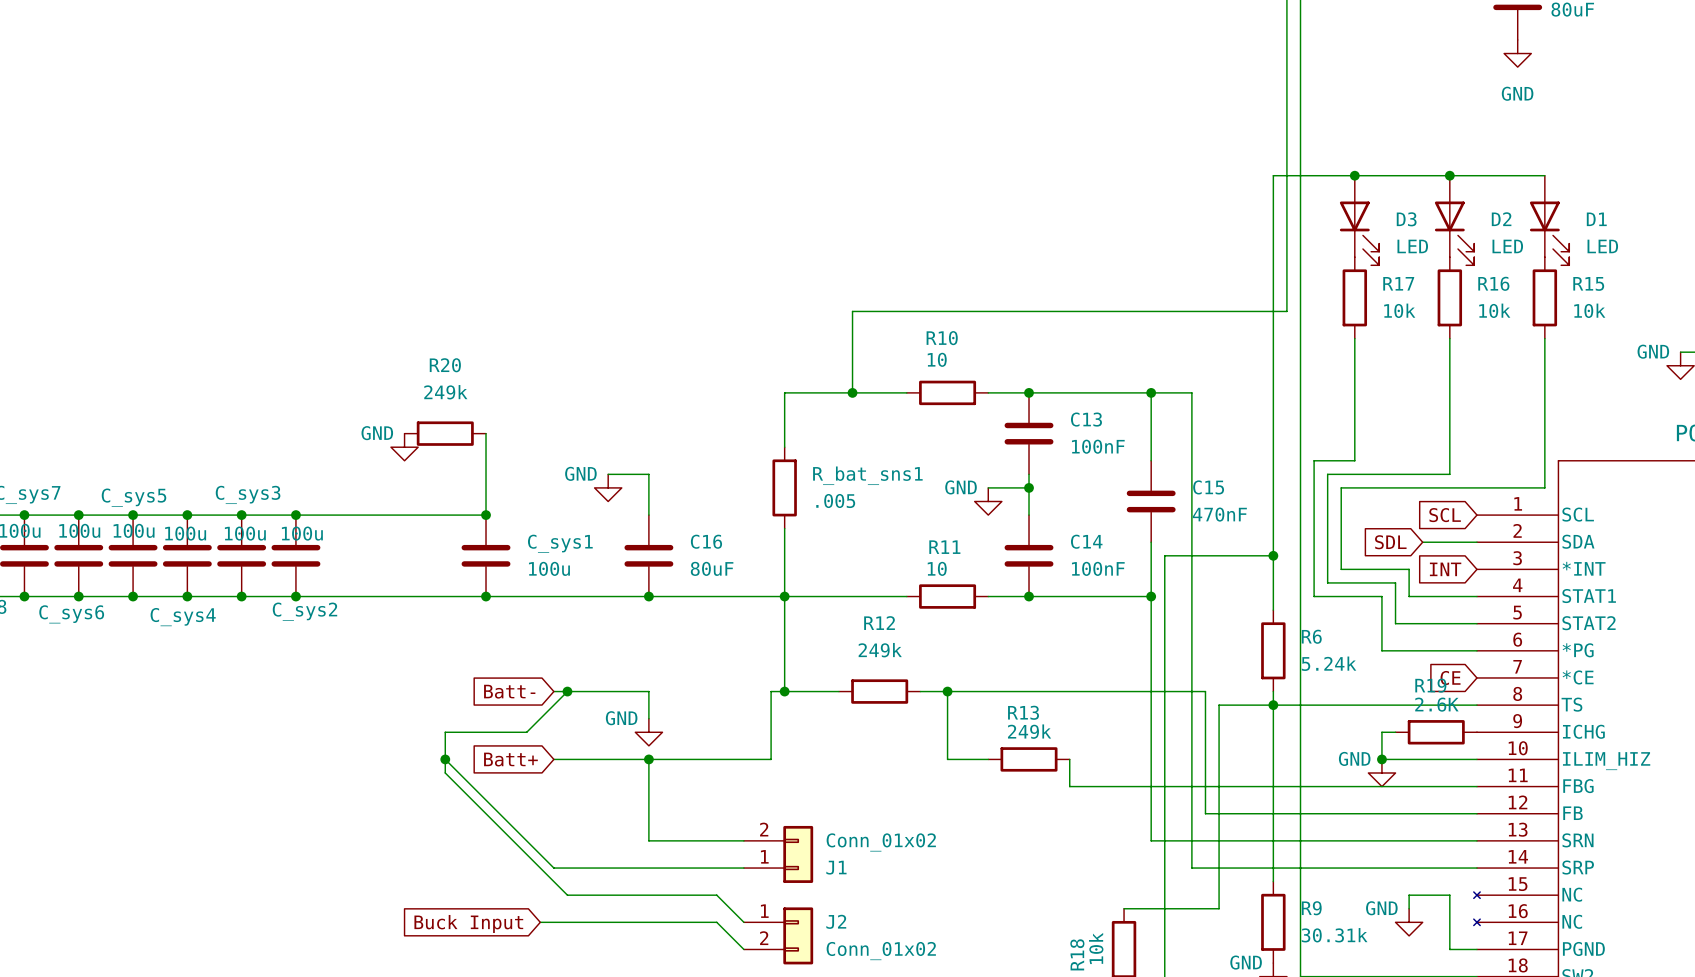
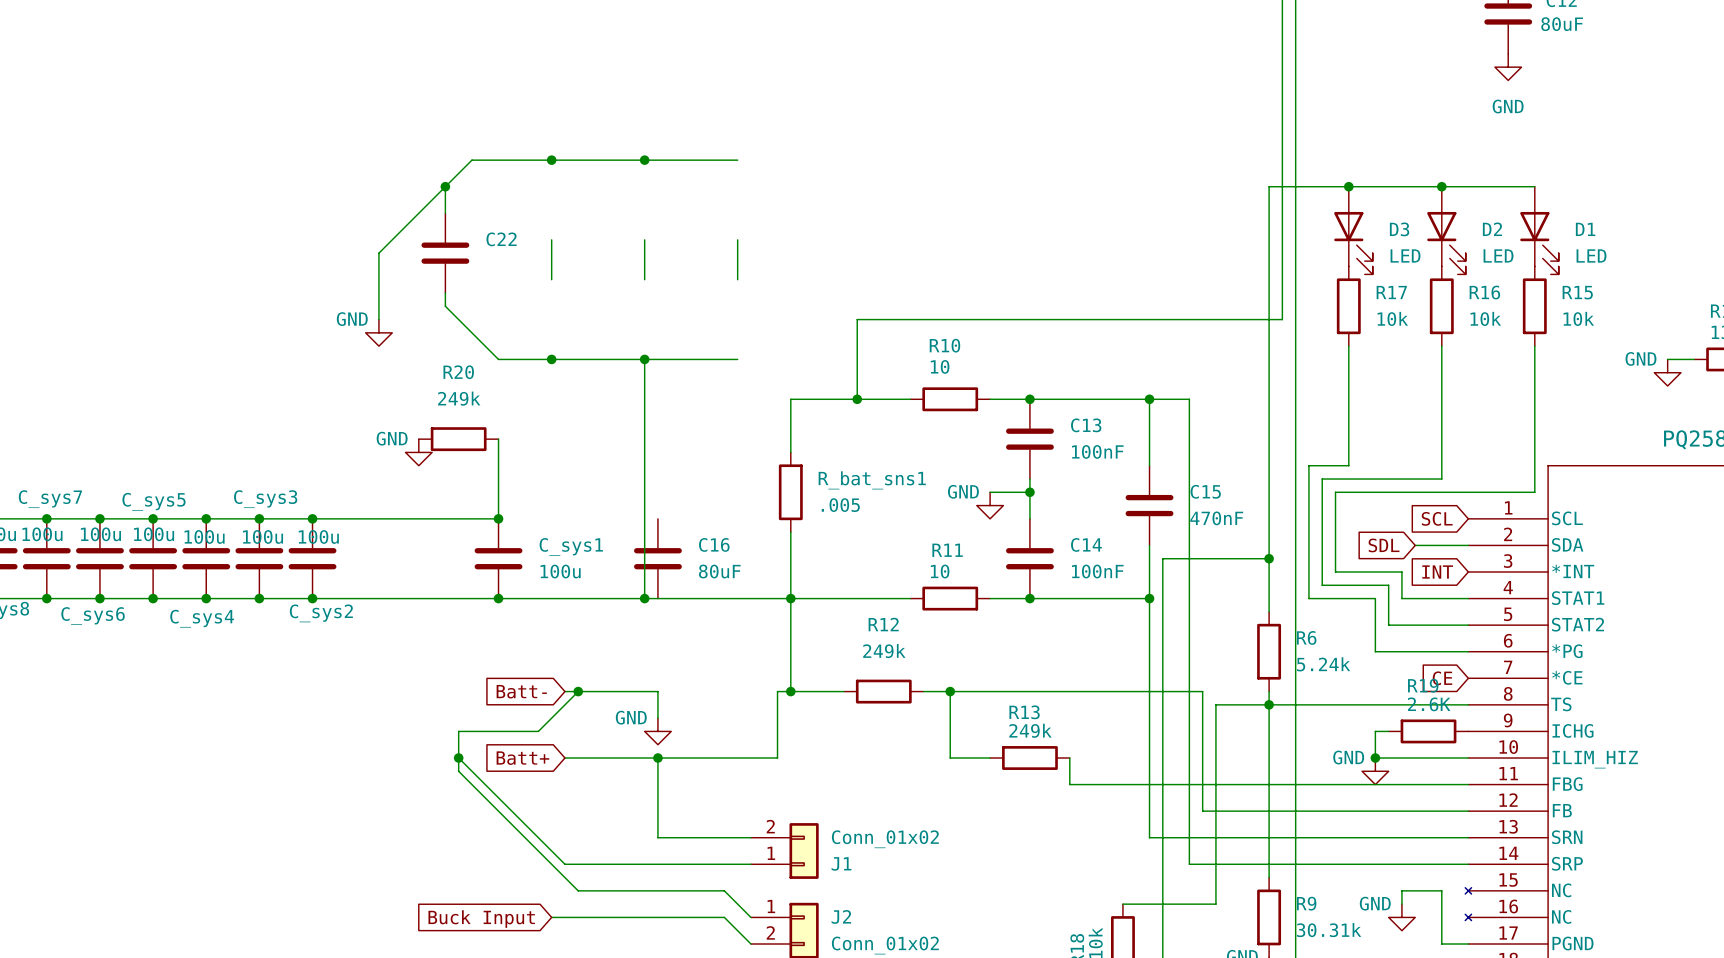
junction: none -> (551, 160)
junction: none -> (644, 160)
wire: none -> (737, 160) (471, 160) (378, 253) (378, 319)
wire: none -> (445, 186) (445, 213)
junction: none -> (445, 186)
wire: none -> (551, 239) (551, 279)
wire: none -> (644, 239) (644, 279)
wire: none -> (737, 239) (737, 279)
C22: none -> (445, 253)
wire: none -> (445, 293) (445, 306) (498, 359) (737, 359)
power symbol: none -> GND (378, 332)
junction: none -> (551, 359)
wire: none -> (644, 359) (644, 598)
junction: none -> (644, 359)
wire: (608, 474) (648, 474) (648, 515) -> none
power symbol: GND (608, 487) -> none
junction position: (648, 596) -> (644, 598)

